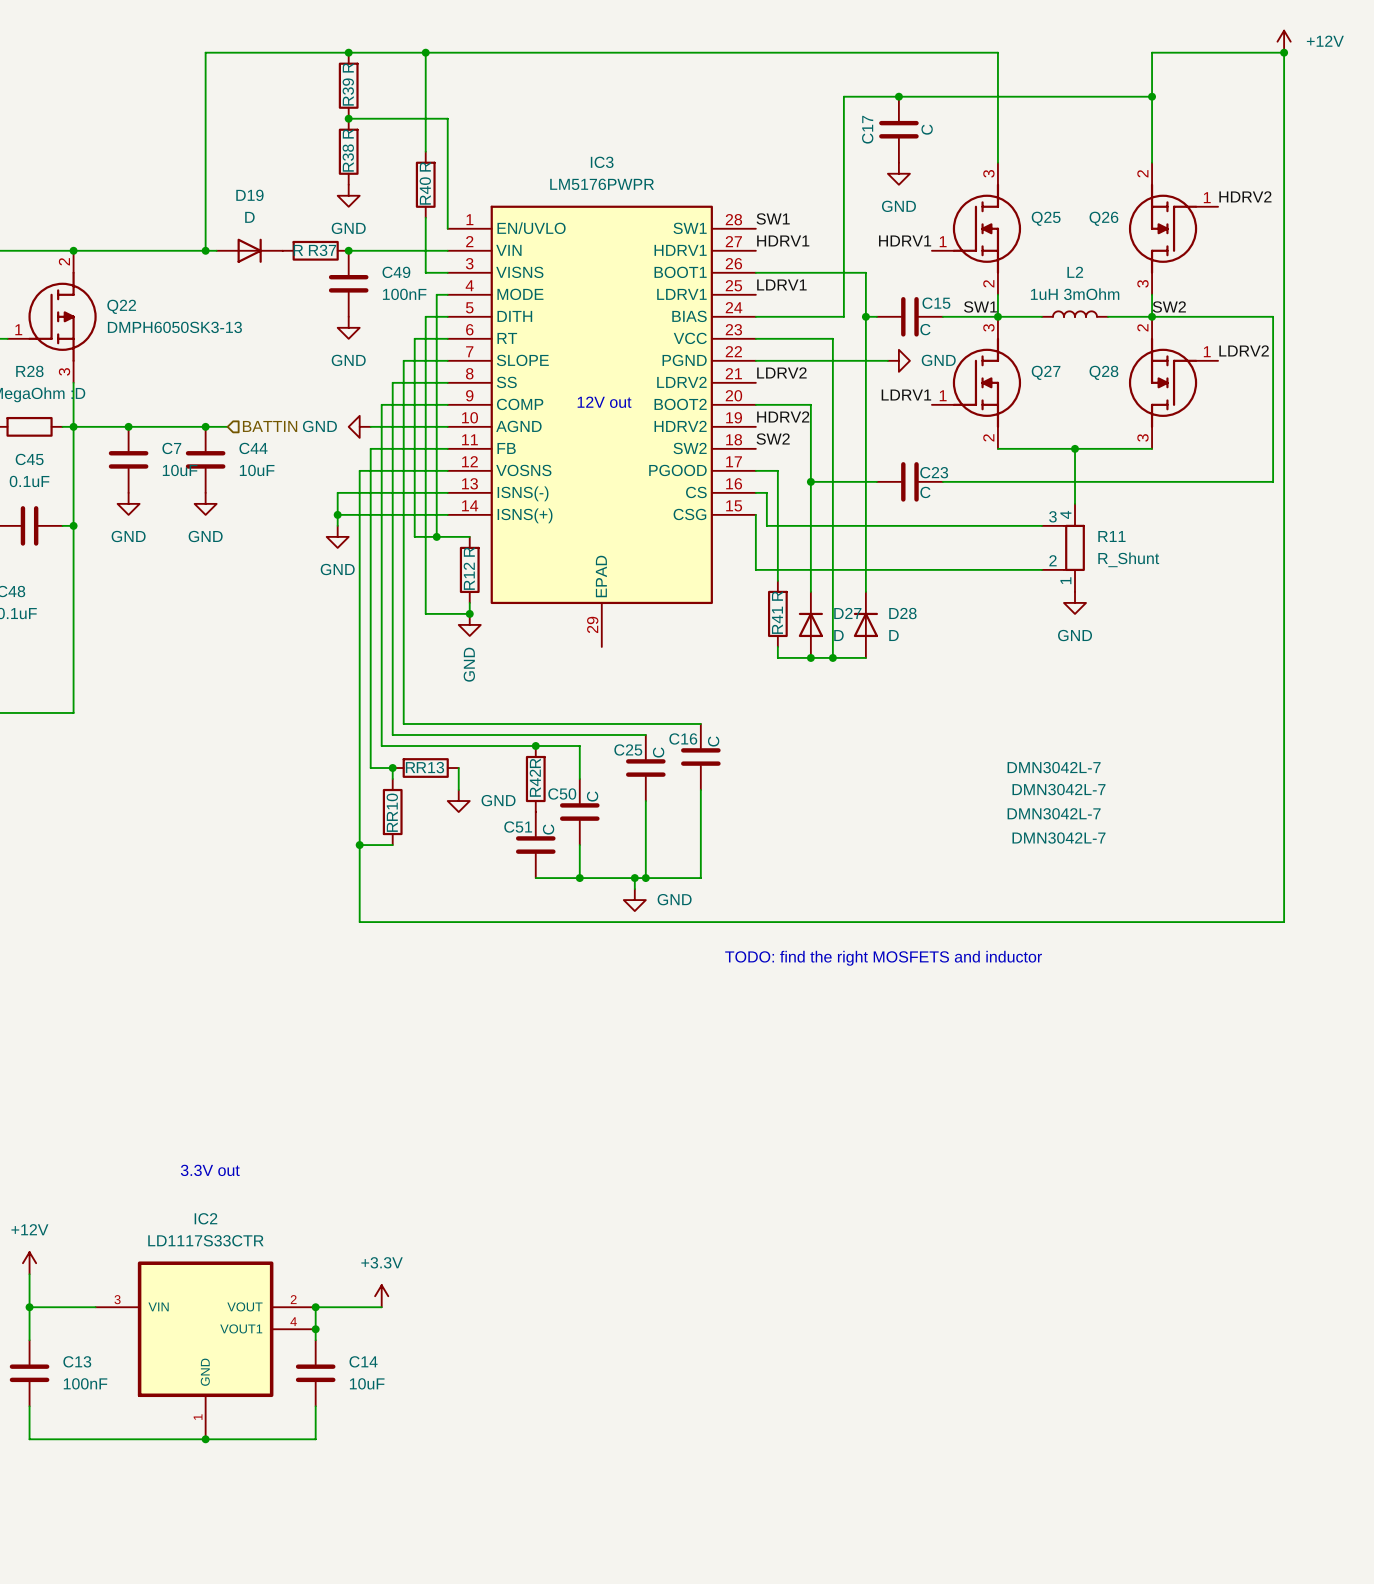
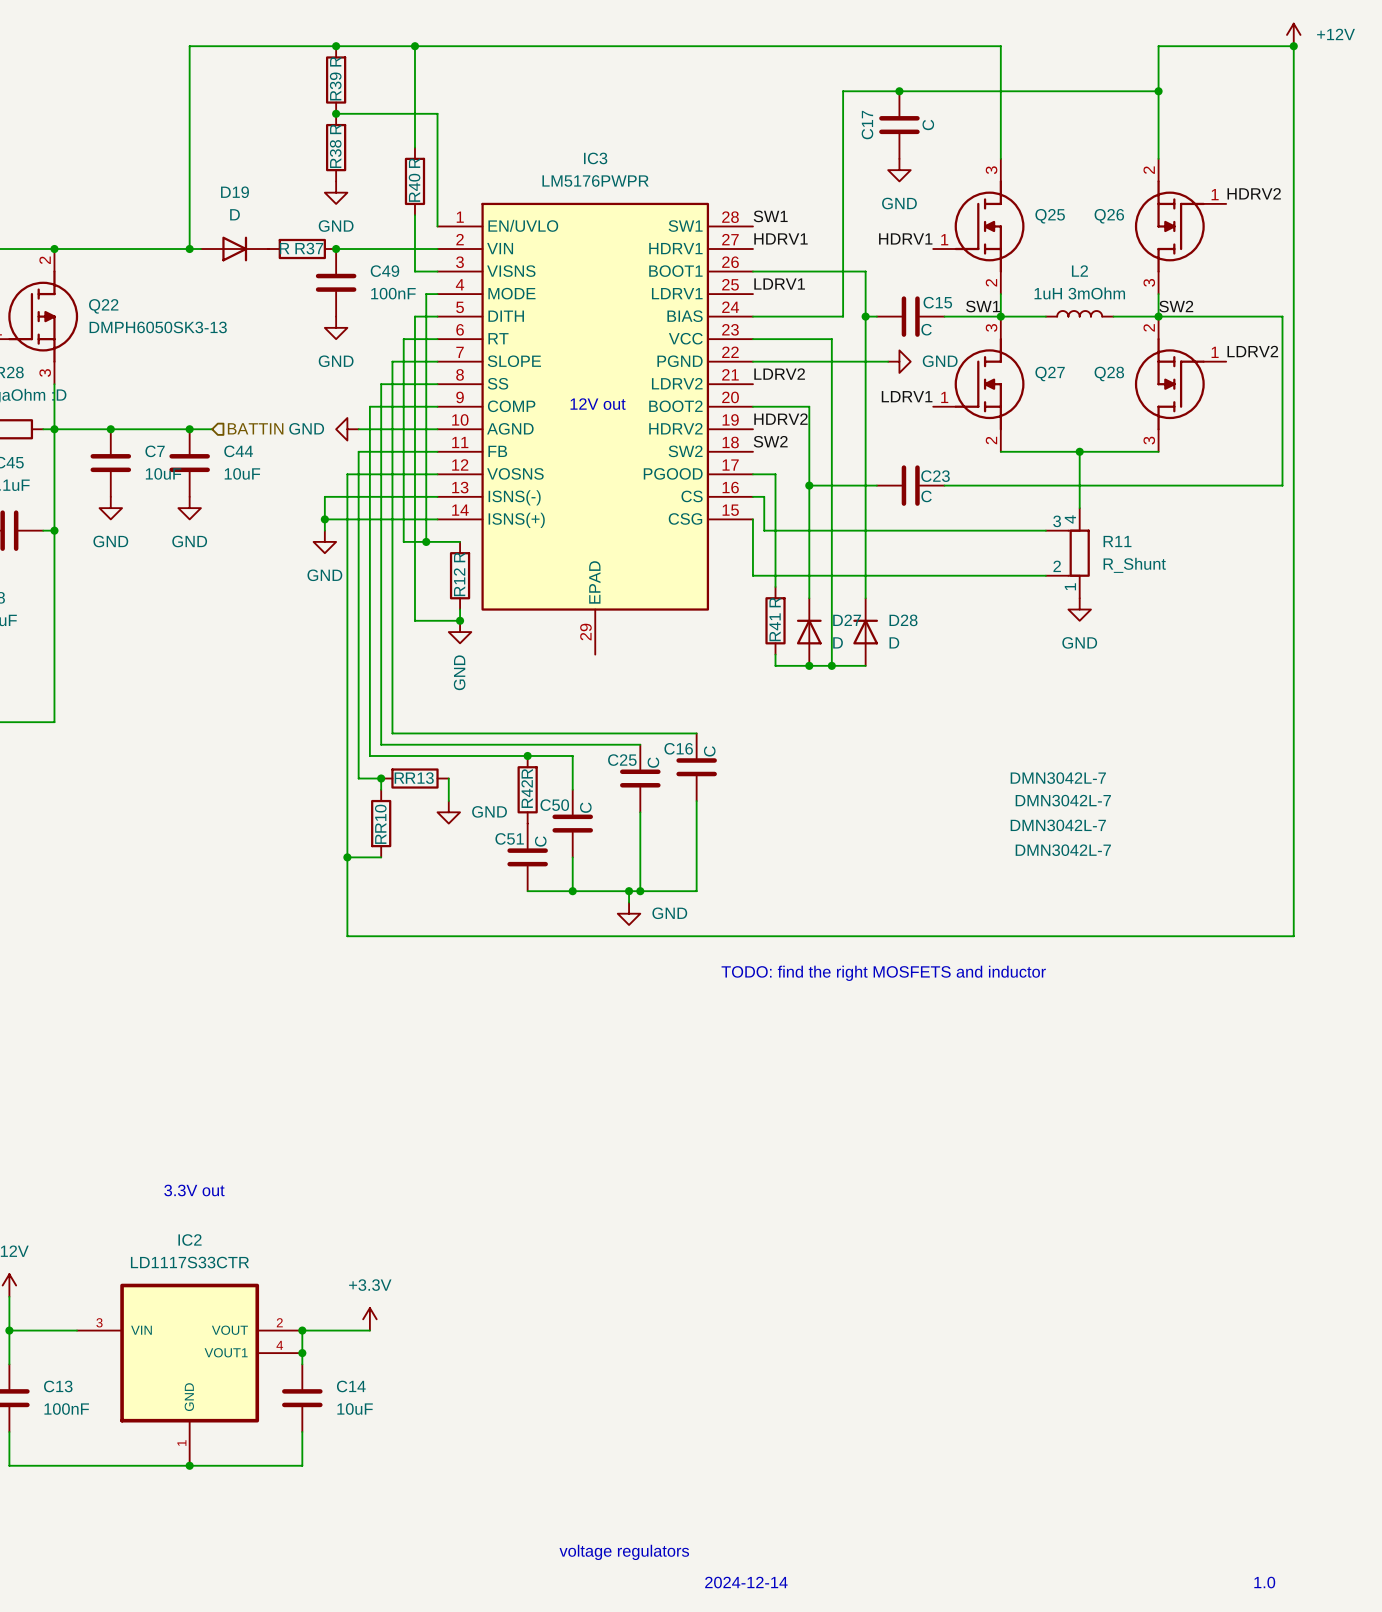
text: none -> voltage regulators (624, 1552)
text: none -> 2024-12-14 (746, 1582)
text: none -> 1.0 (1264, 1582)

